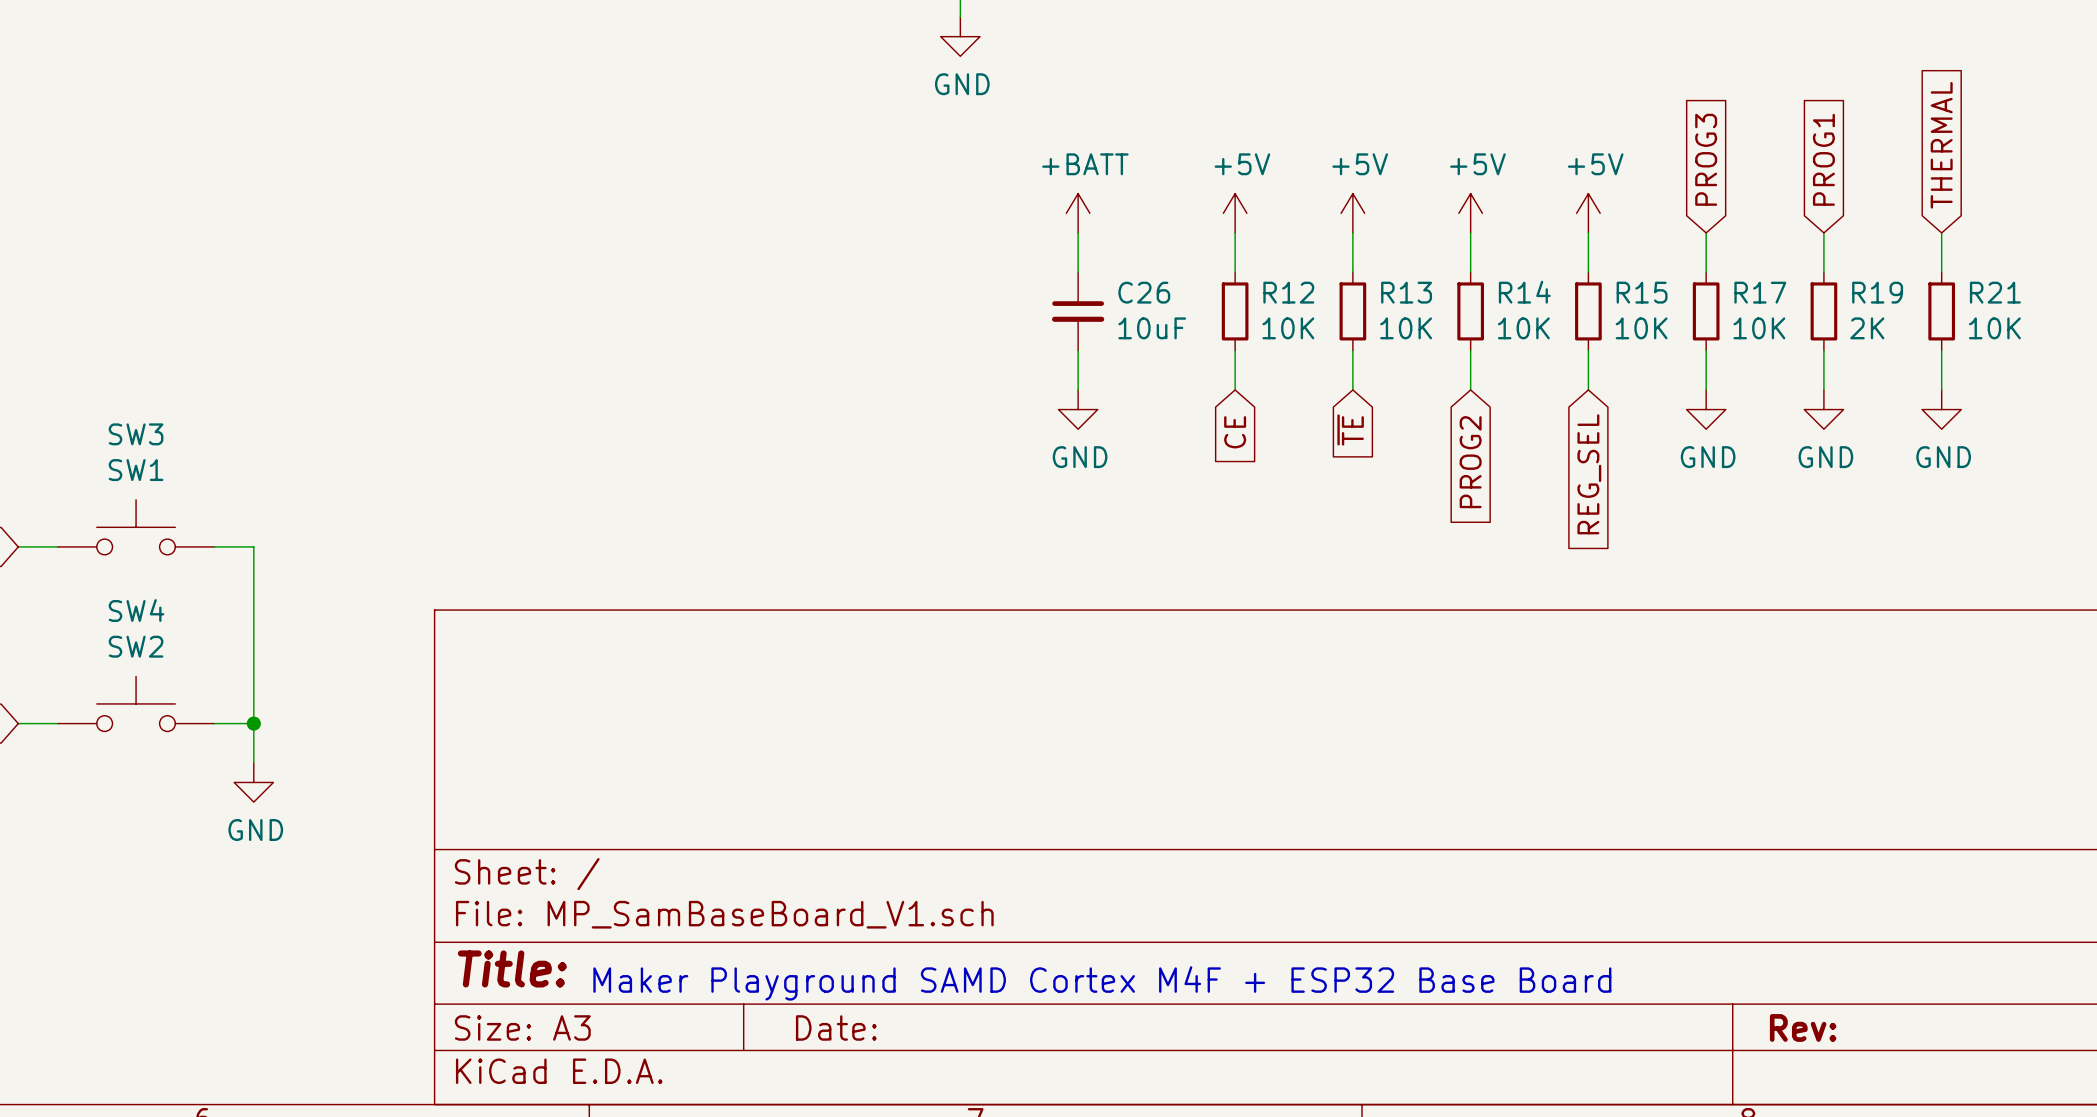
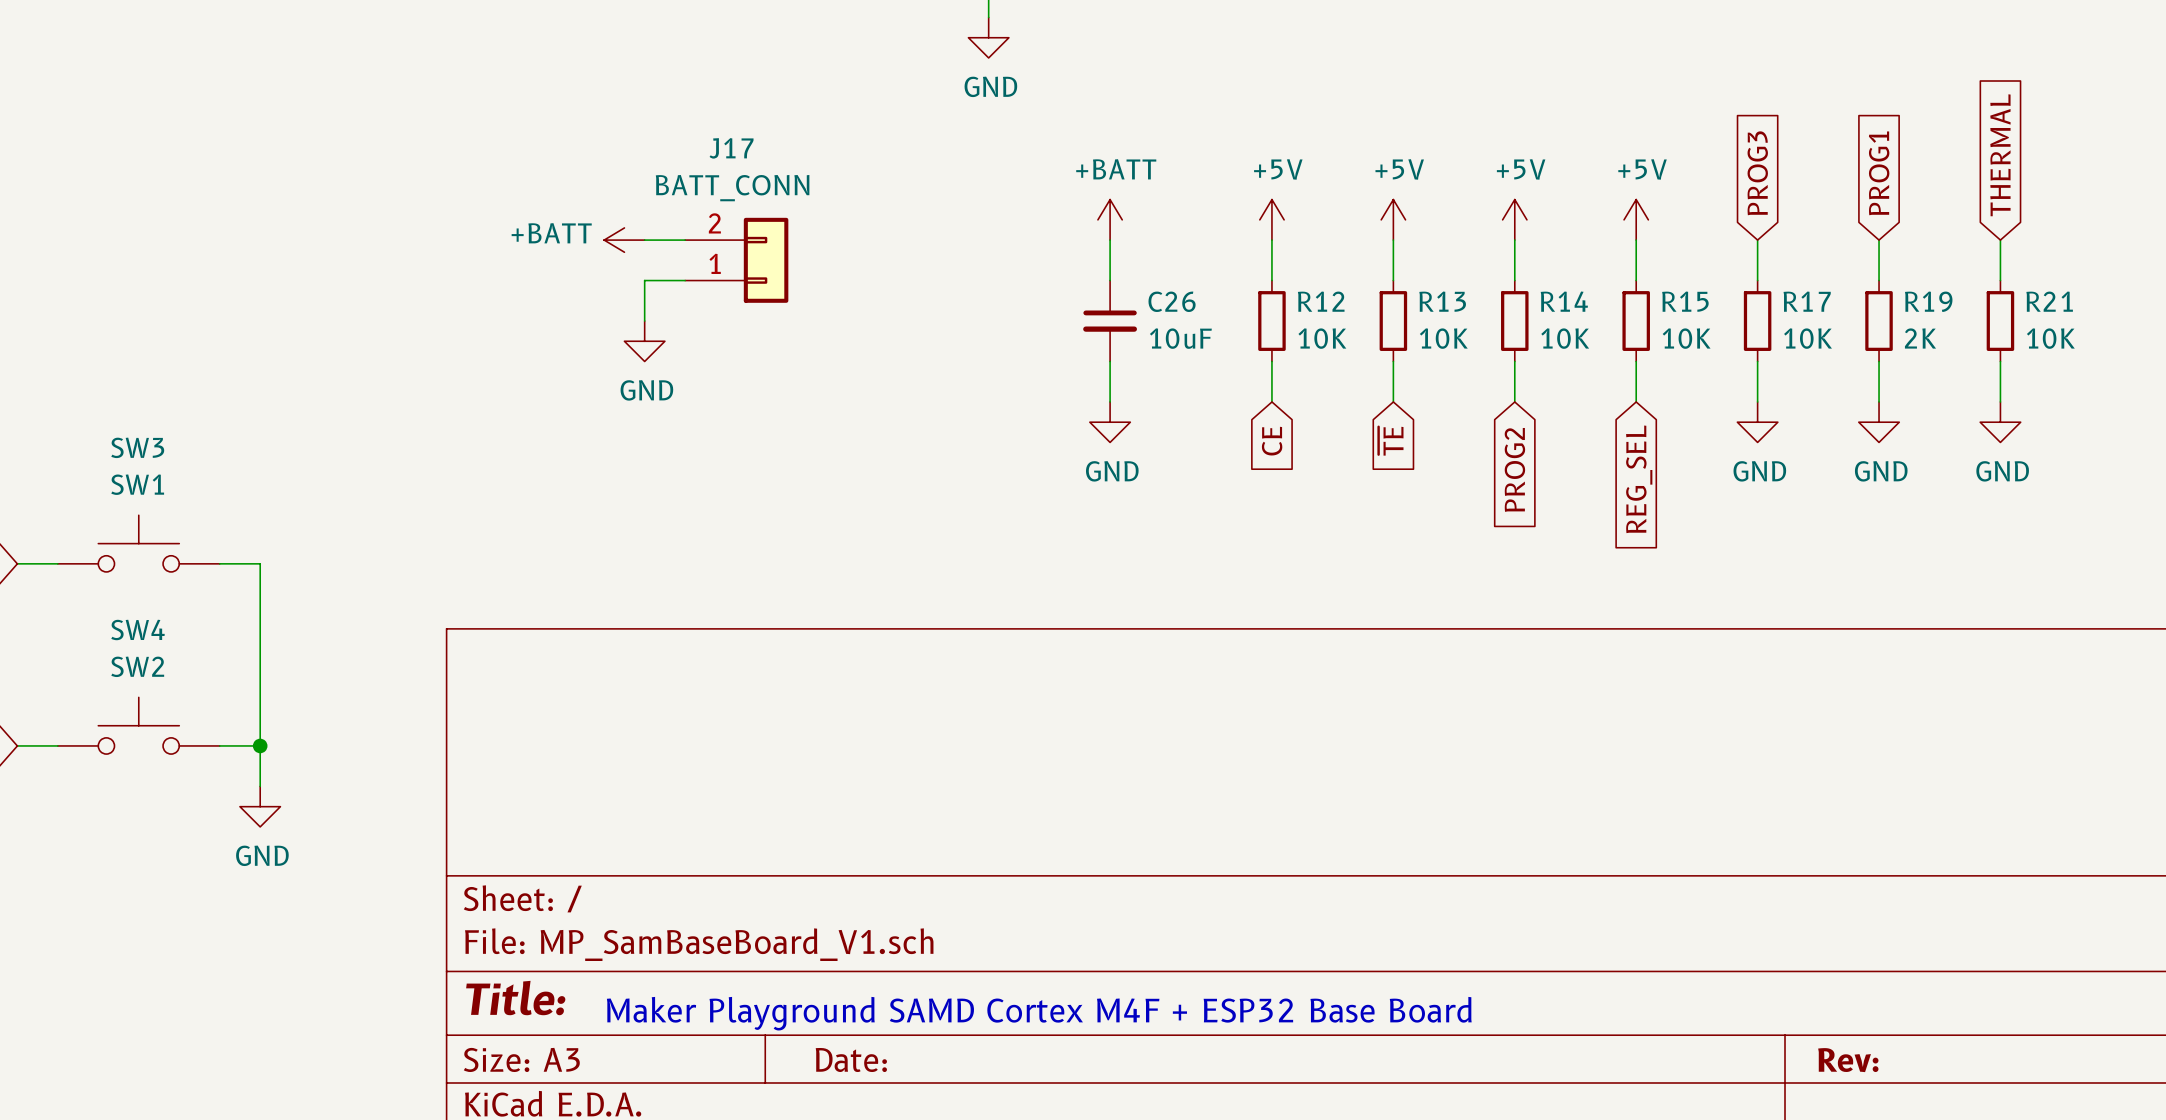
power symbol: none -> +BATT (624, 240)
wire: none -> (644, 240) (685, 240)
J17: none -> BATT_CONN (736, 260)
wire: none -> (685, 280) (644, 280) (644, 321)
power symbol: none -> GND (644, 341)

